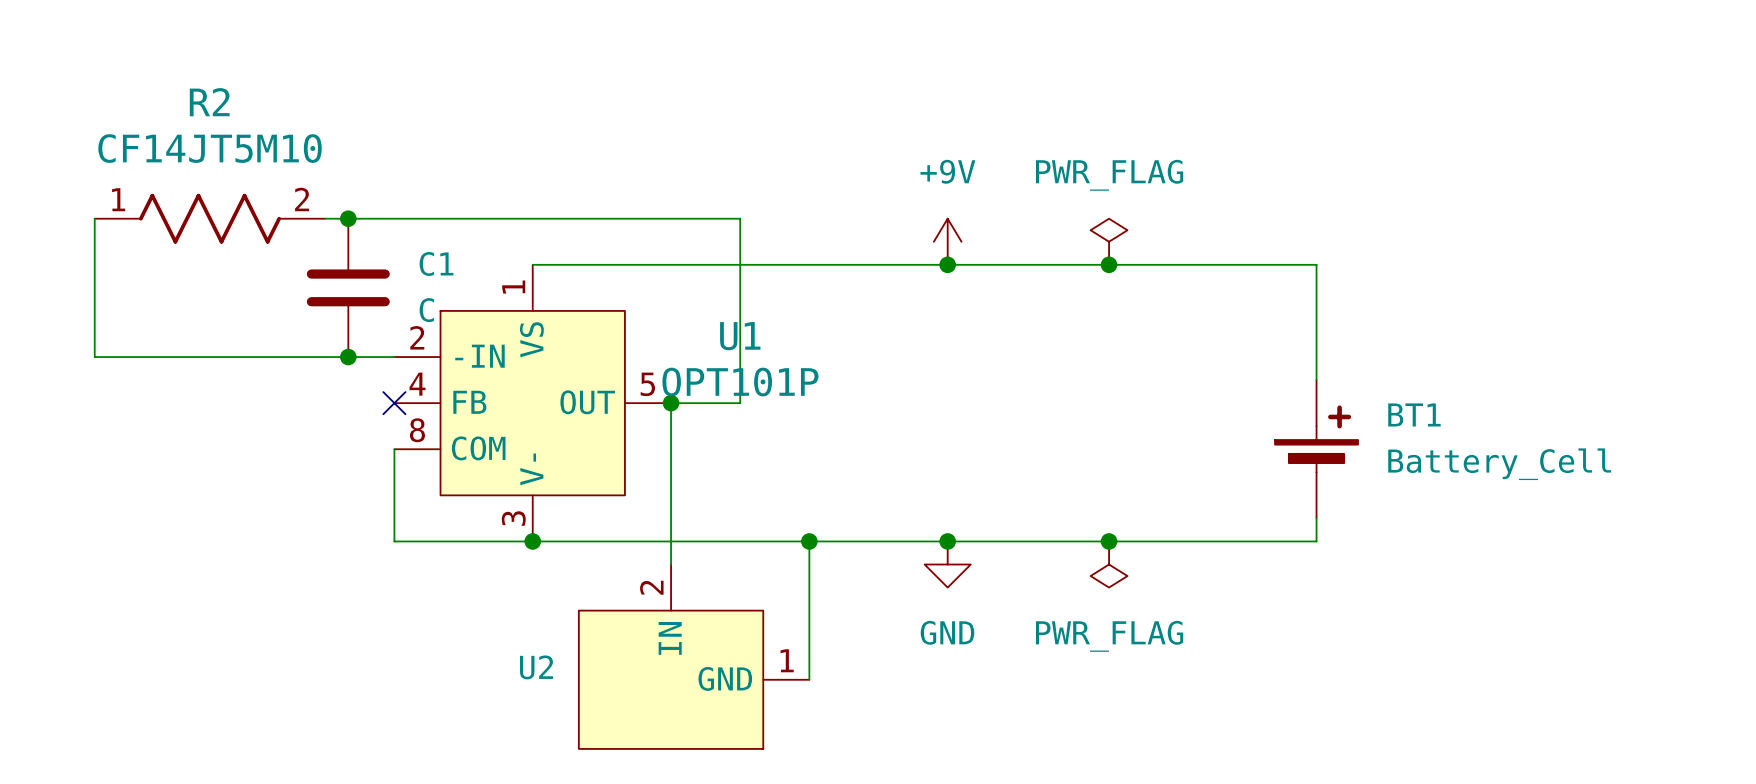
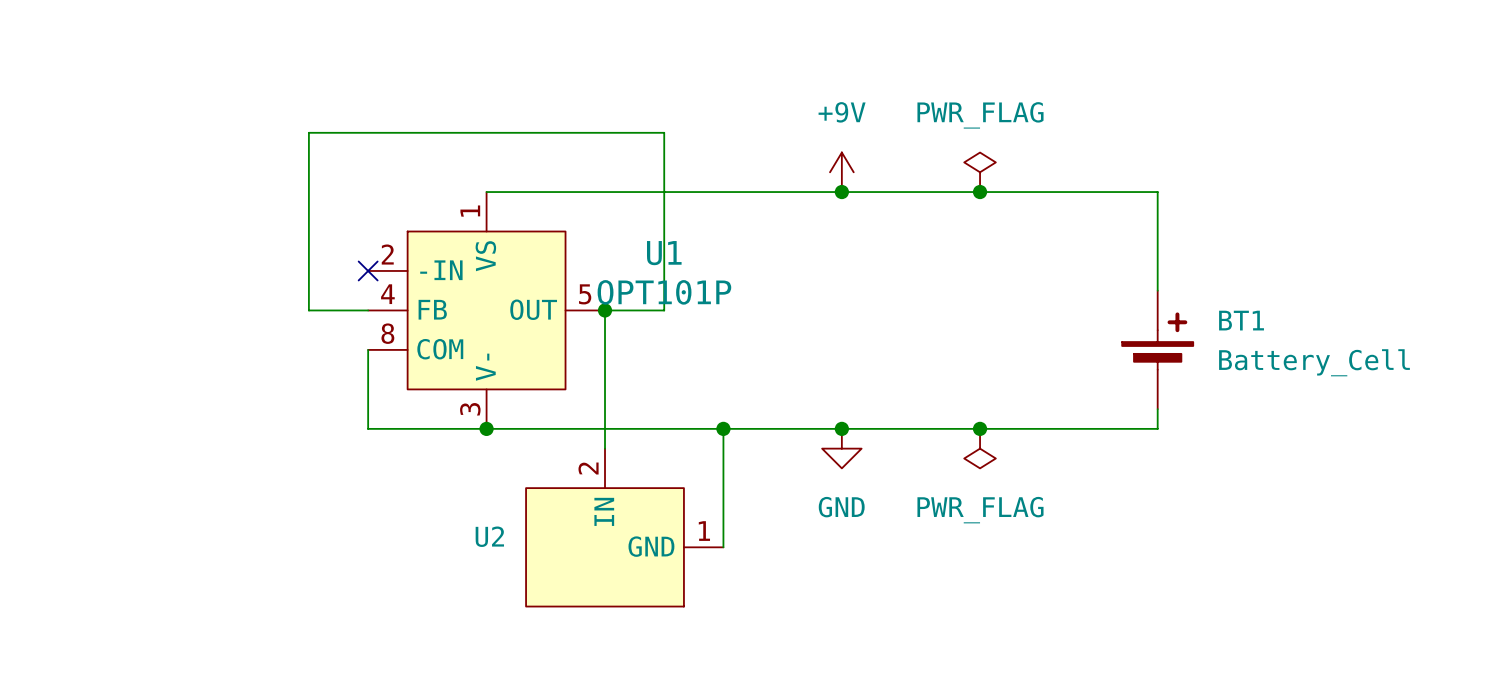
wire: (94, 218) (94, 357) (394, 357) -> none
R2: CF14JT5M10 (209, 218) -> none
wire: (325, 218) (740, 218) -> (368, 310) (308, 310) (308, 132) (664, 132) (664, 152)
junction: (348, 218) -> none
C1: C (348, 287) -> none
junction: (348, 357) -> none
no-connect mark position: (394, 403) -> (368, 270)

